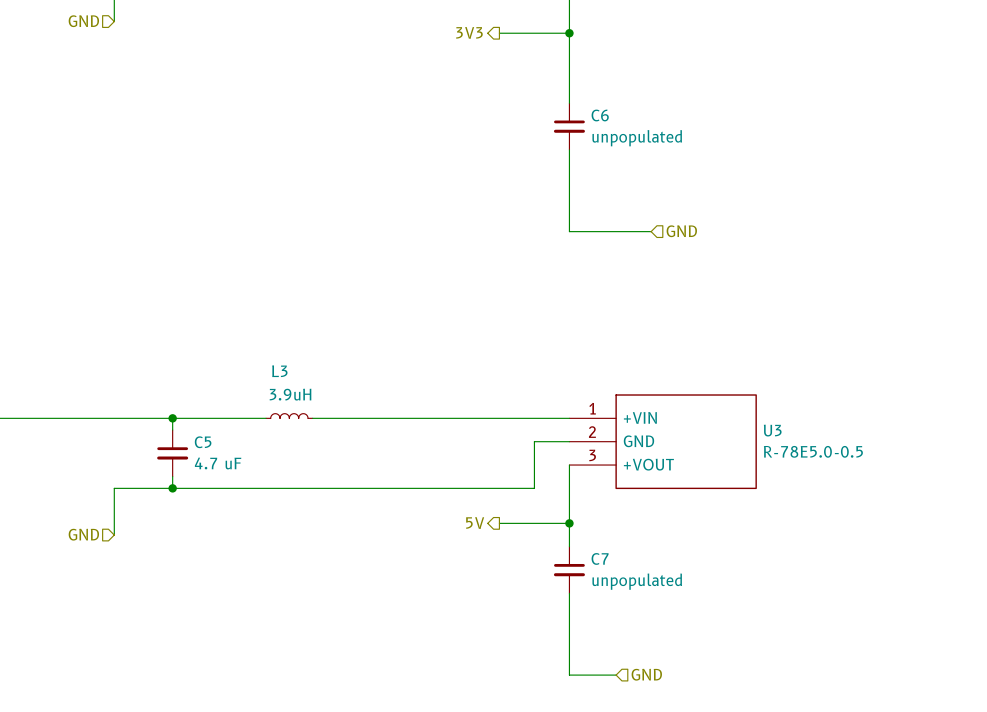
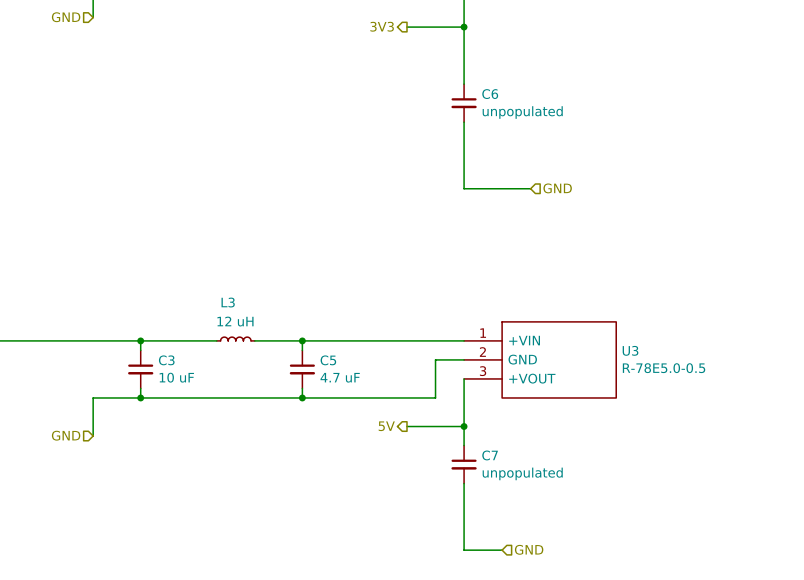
L3 value: 3.9uH (290, 394) -> 12 uH (235, 321)
wire: none -> (302, 340) (302, 350)
junction: none -> (302, 340)
C5 name: C5 (203, 442) -> C3 (166, 360)
C5: none -> 4.7 uF (302, 369)
C5 value: 4.7 uF (218, 463) -> 10 uF (176, 377)
wire: none -> (302, 388) (302, 397)
junction: none -> (302, 397)

